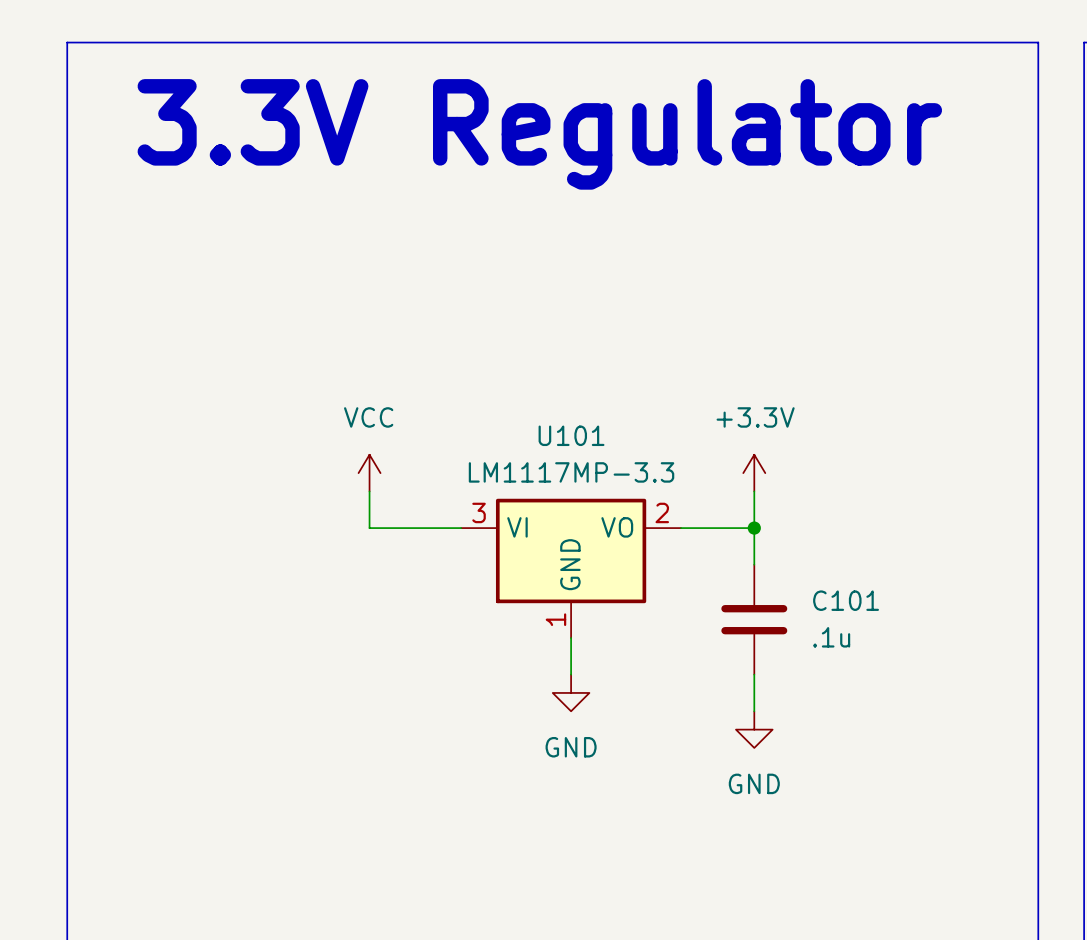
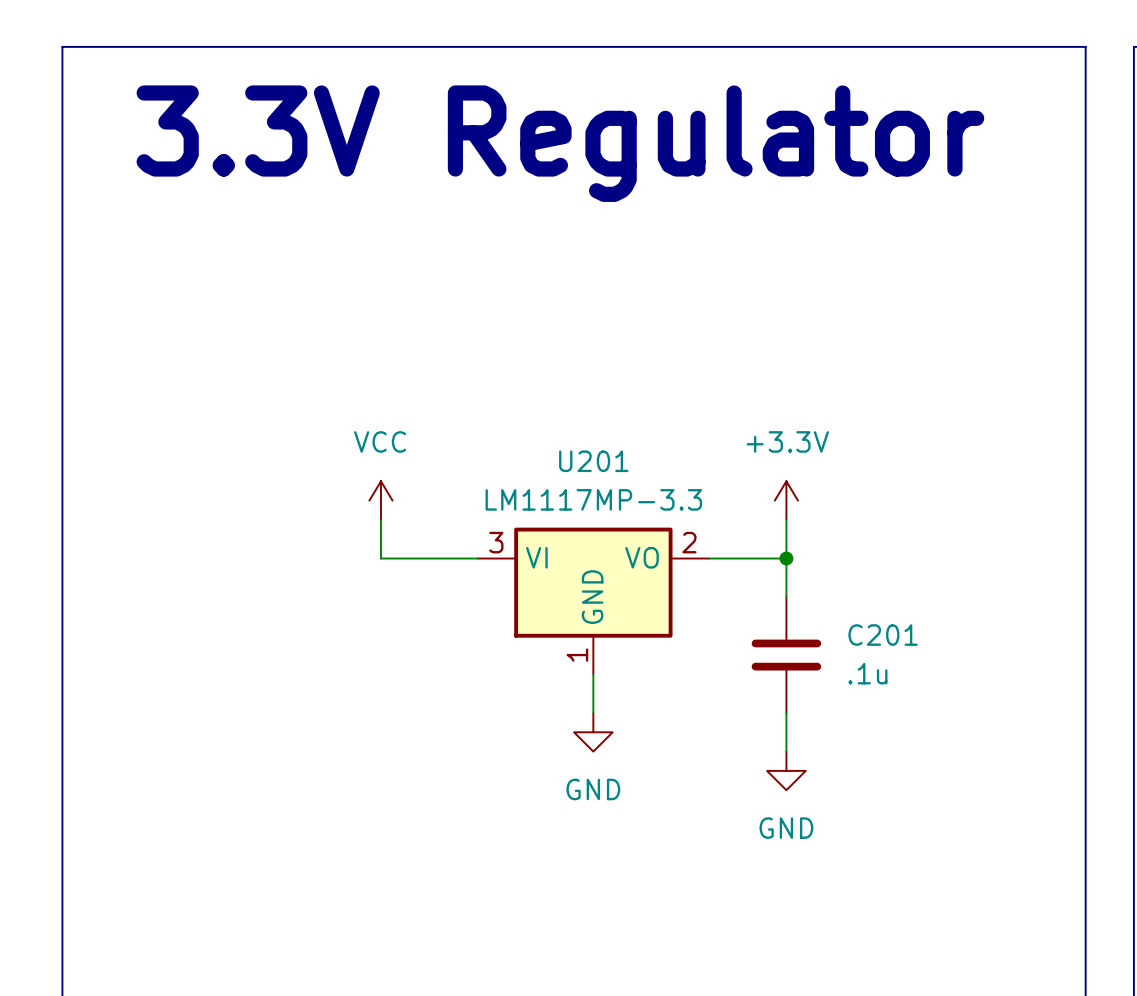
U101 name: U101 (571, 435) -> U201 (593, 461)
C101 name: C101 (846, 600) -> C201 (883, 635)

